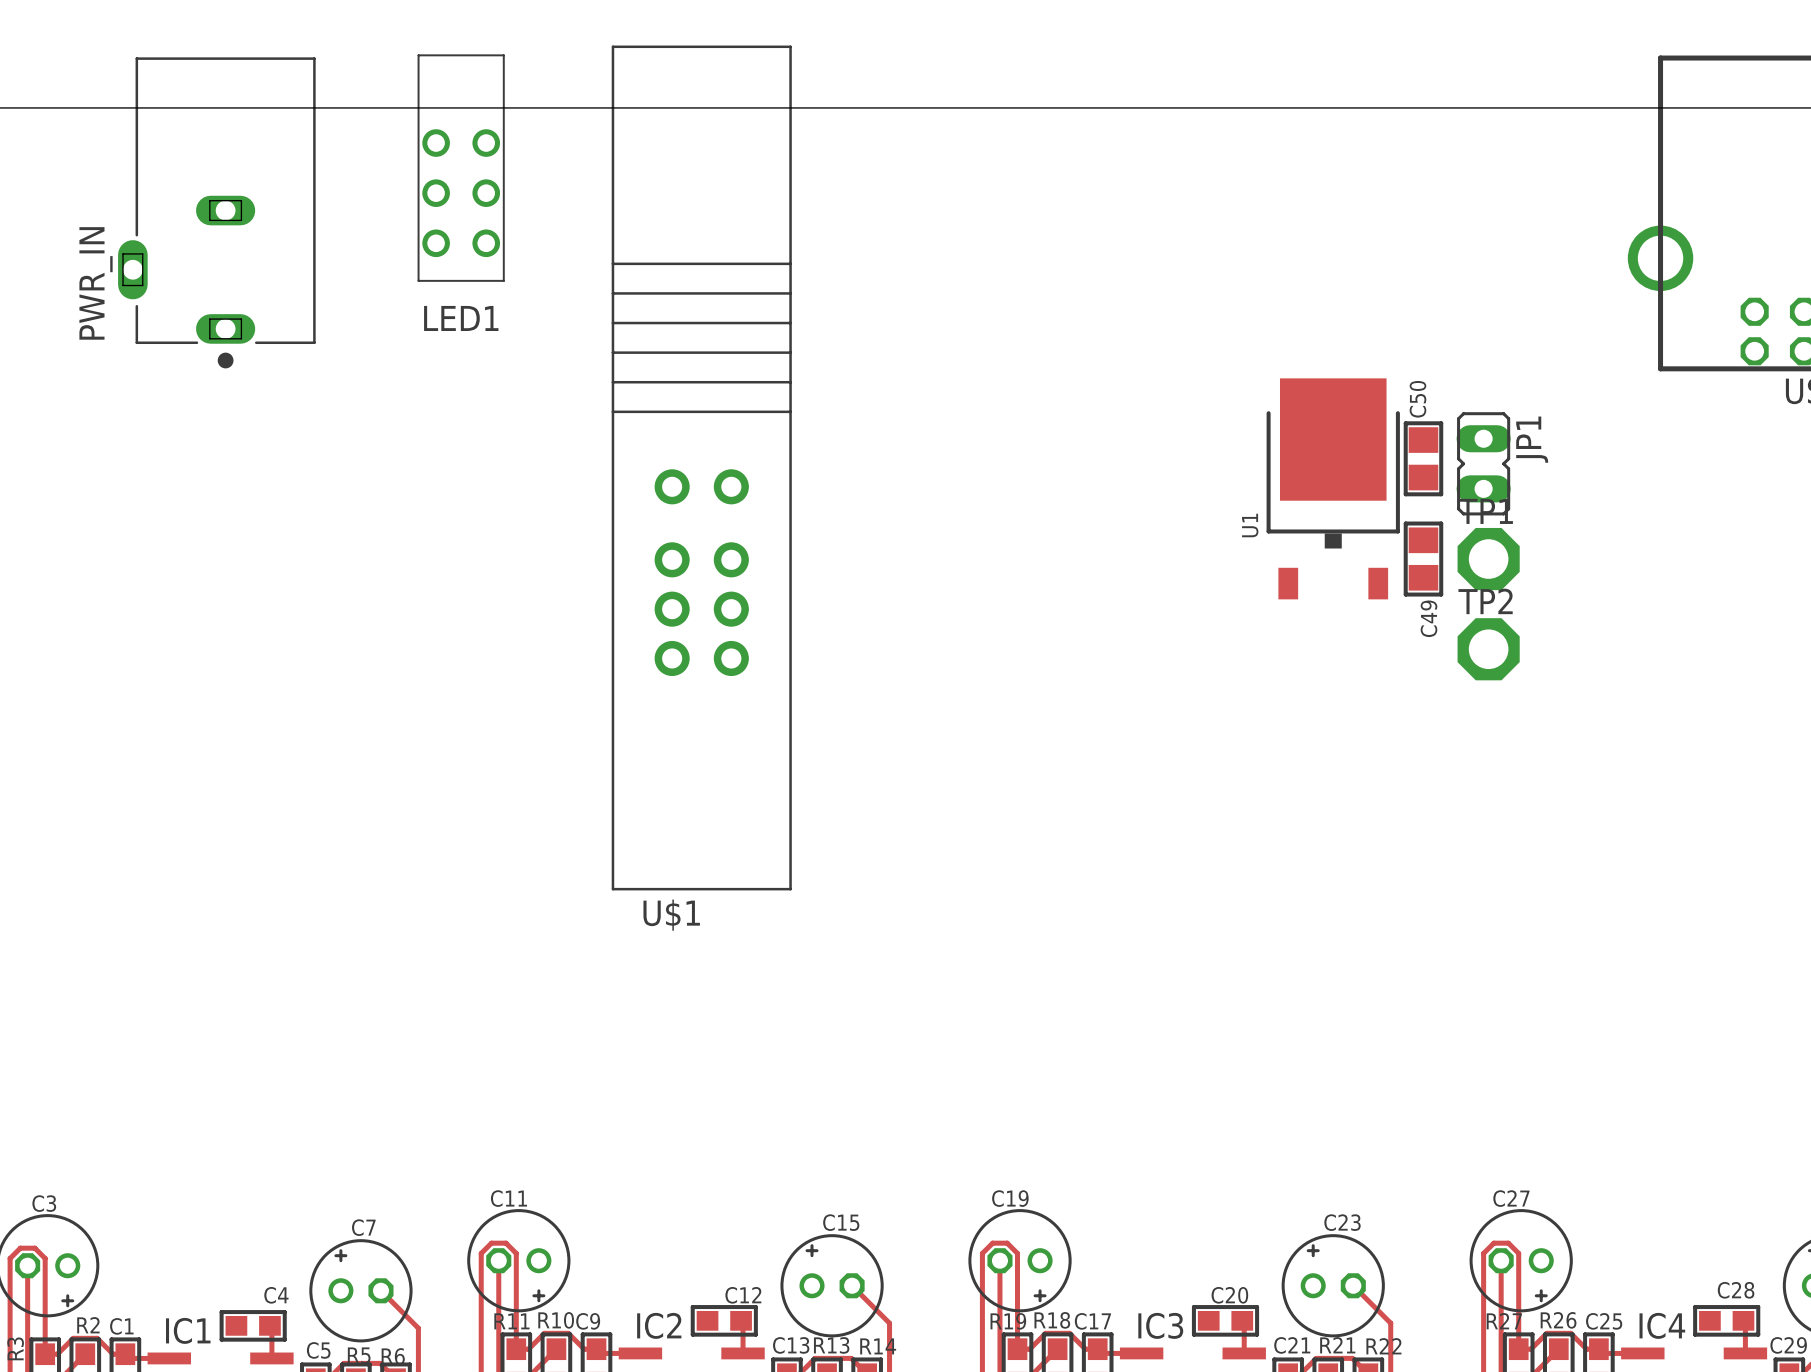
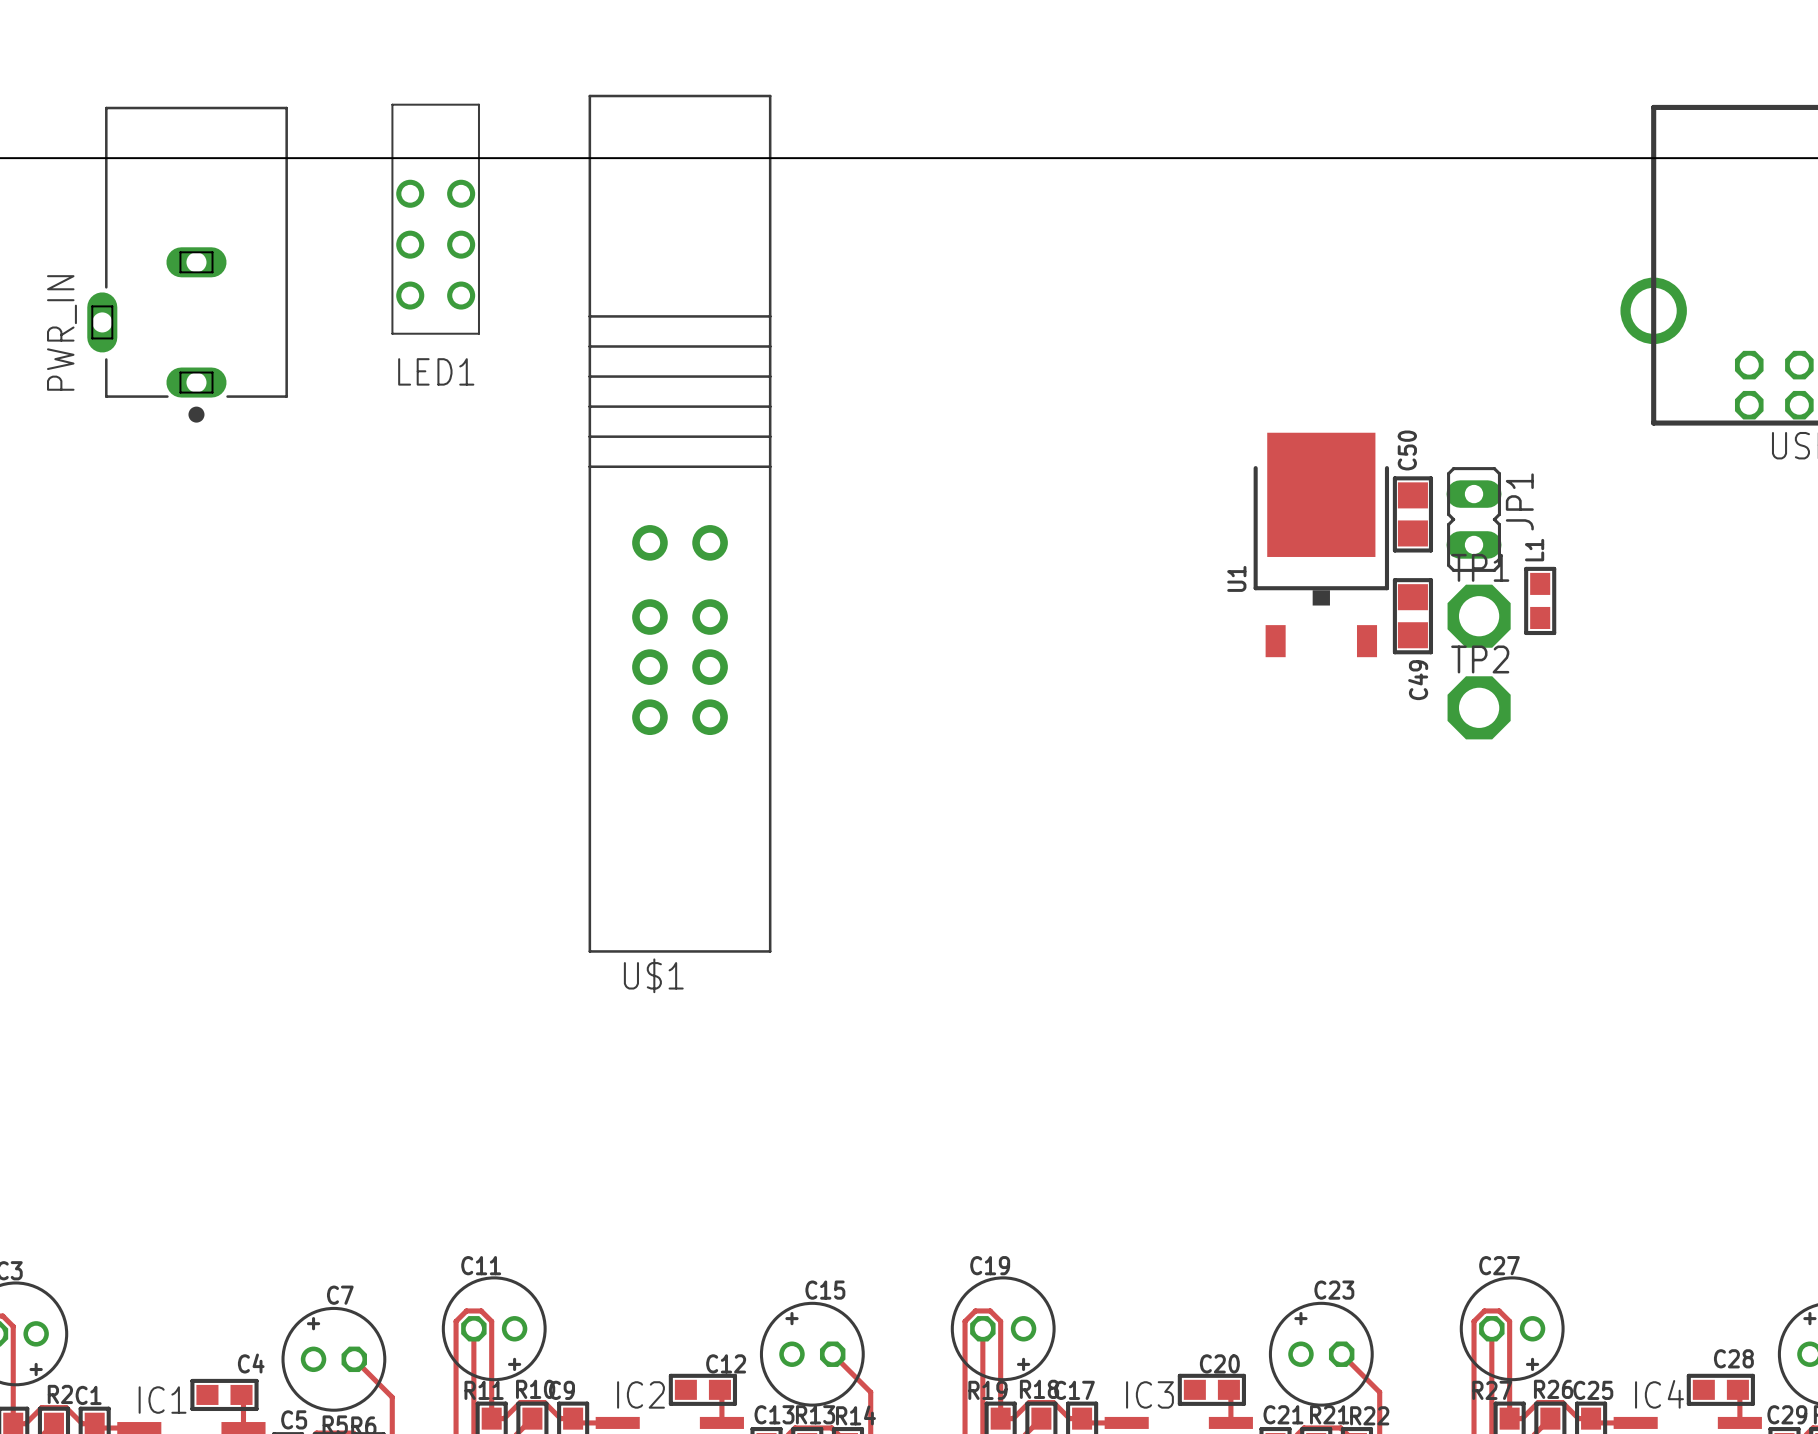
L1: none -> (1540, 600)

